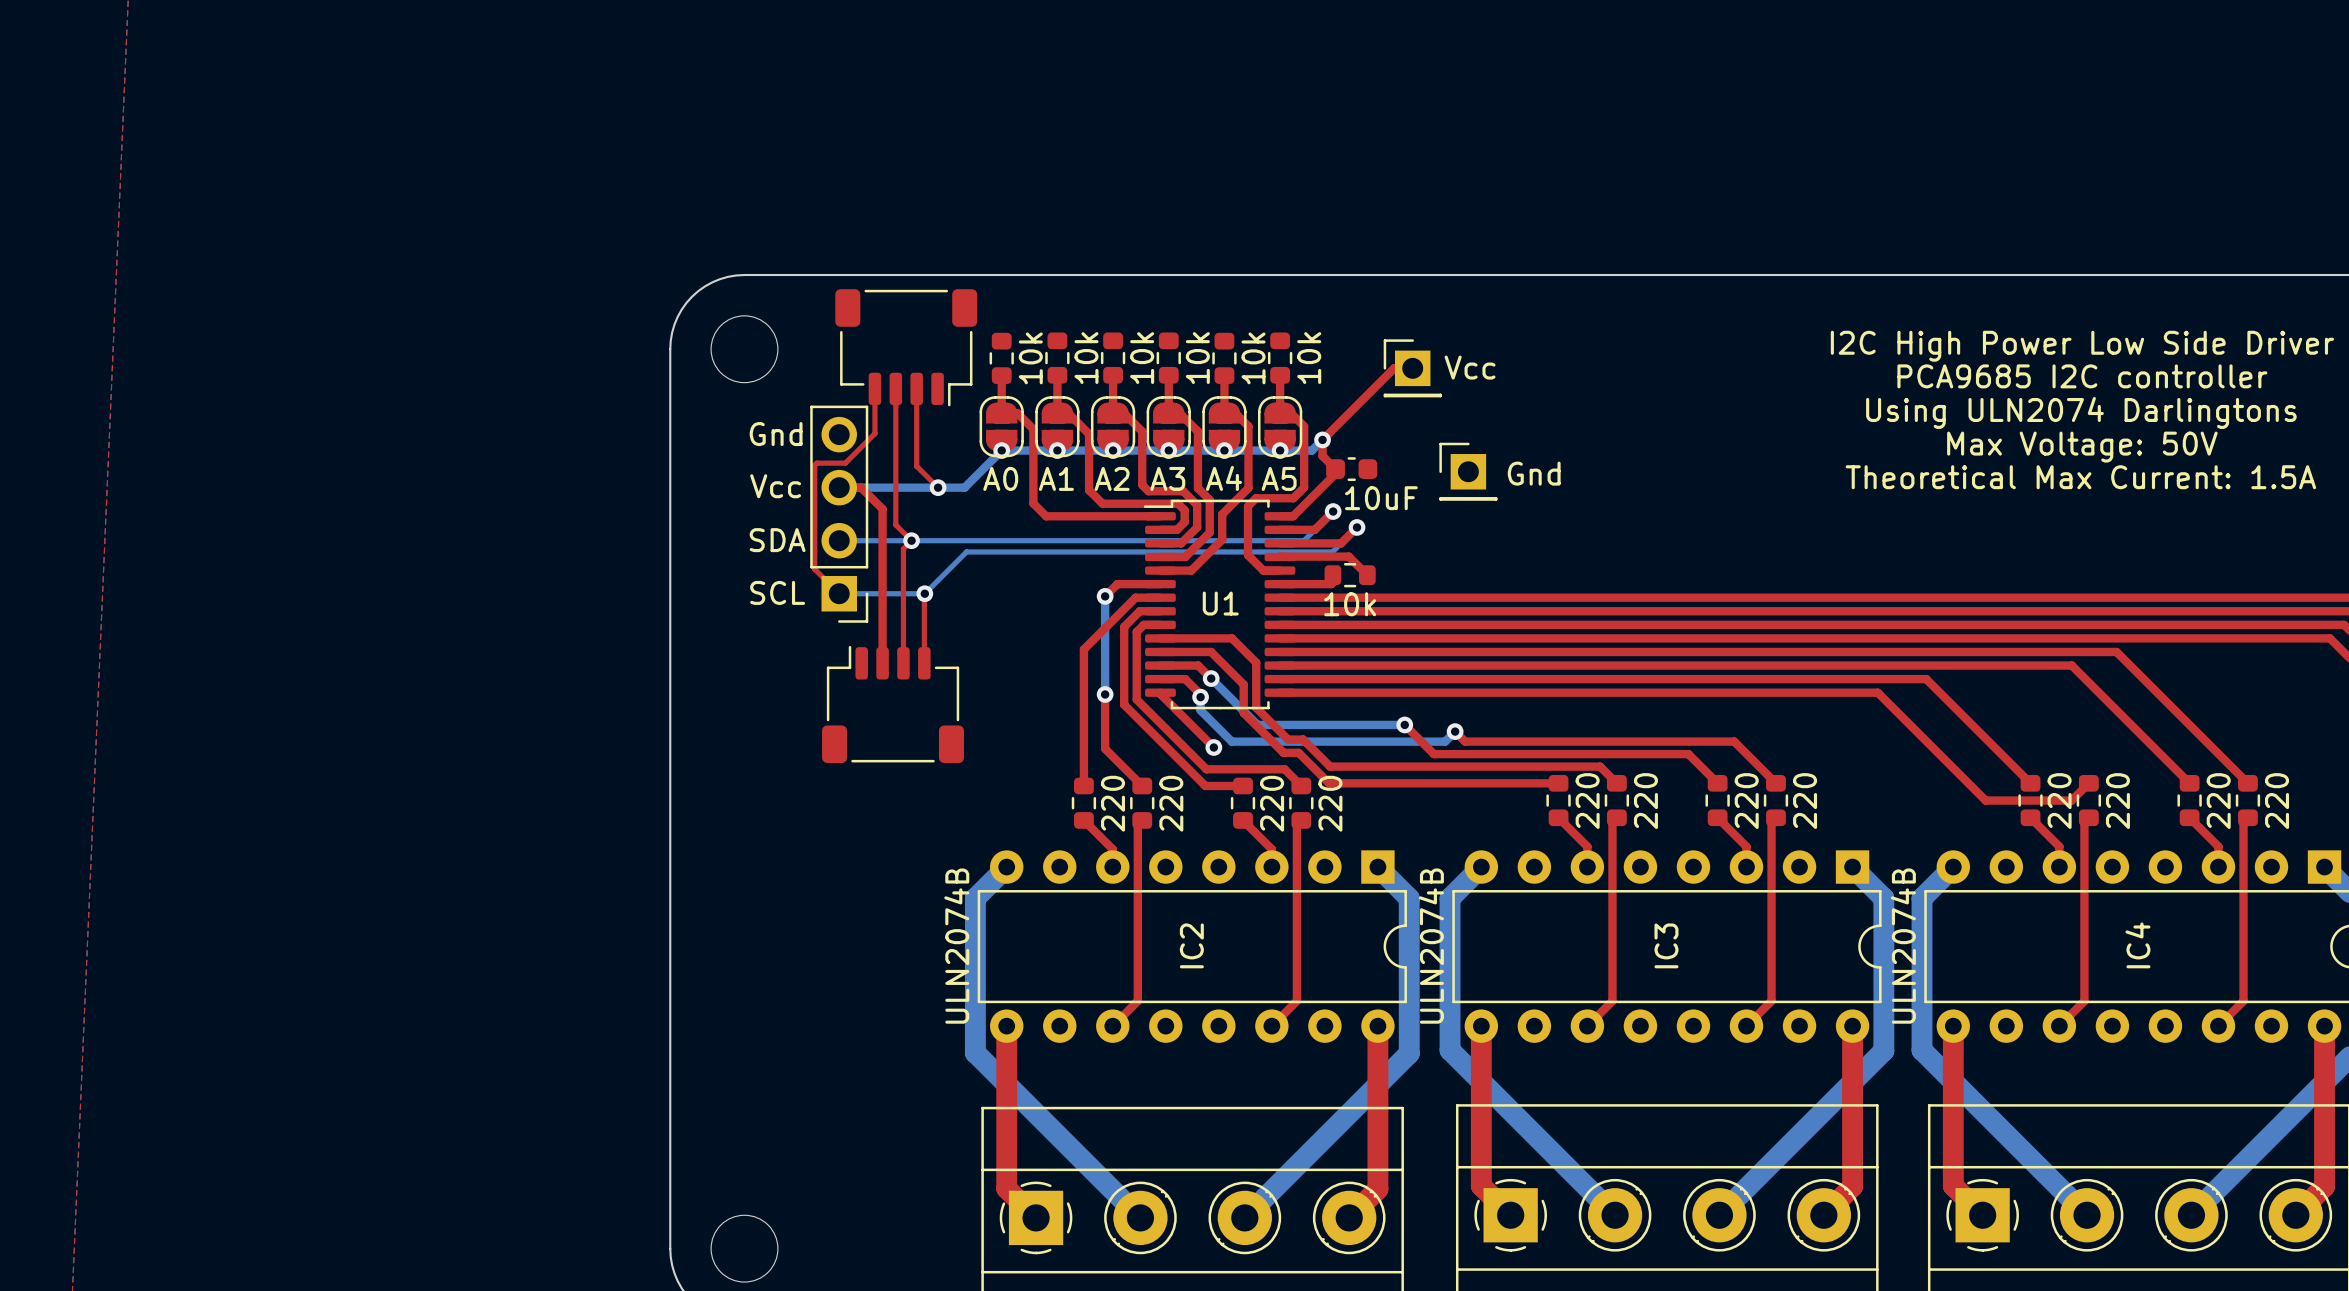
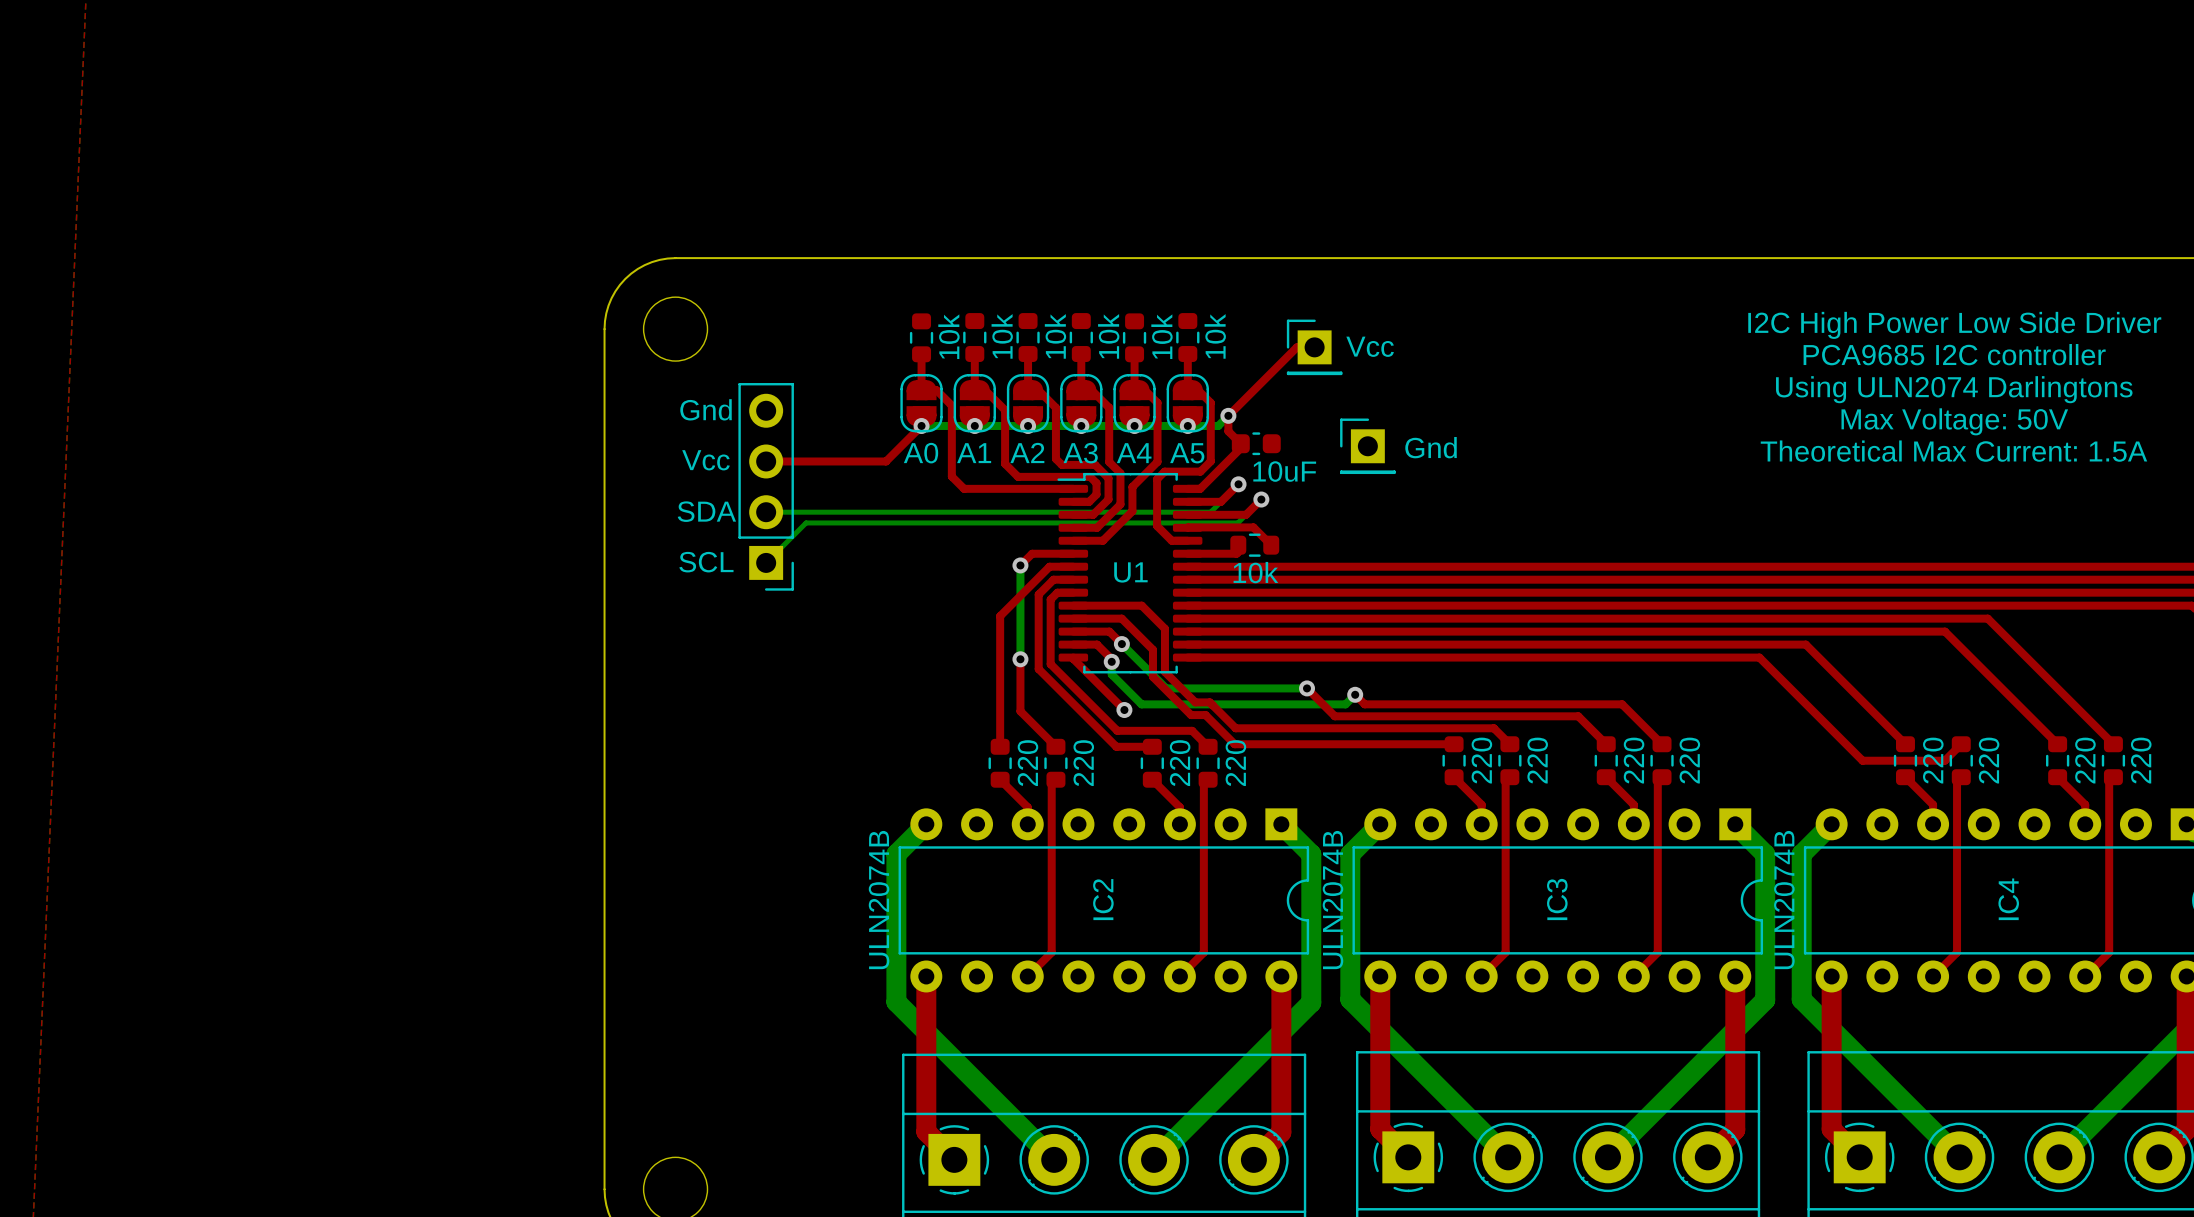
part: (906, 347) -> none
top track: (874, 388) (874, 433) (845, 463) (816, 463) (814, 465) (814, 569) (839, 593) -> none
top track: (895, 388) (895, 524) (911, 540) (903, 548) (903, 663) -> none
top track: (916, 388) (916, 466) (938, 487) -> none
bottom track: (1001, 450) (964, 487) (839, 487) -> none
top track: (861, 487) (882, 509) (882, 663) -> (787, 461) (886, 461) (921, 425)
via: (938, 487) -> none
via: (911, 540) -> none
bottom track: (966, 551) (924, 593) (839, 593) -> (887, 522) (806, 522) (766, 562)
top track: (924, 593) (924, 663) -> none
via: (924, 593) -> none
part: (893, 704) -> none

